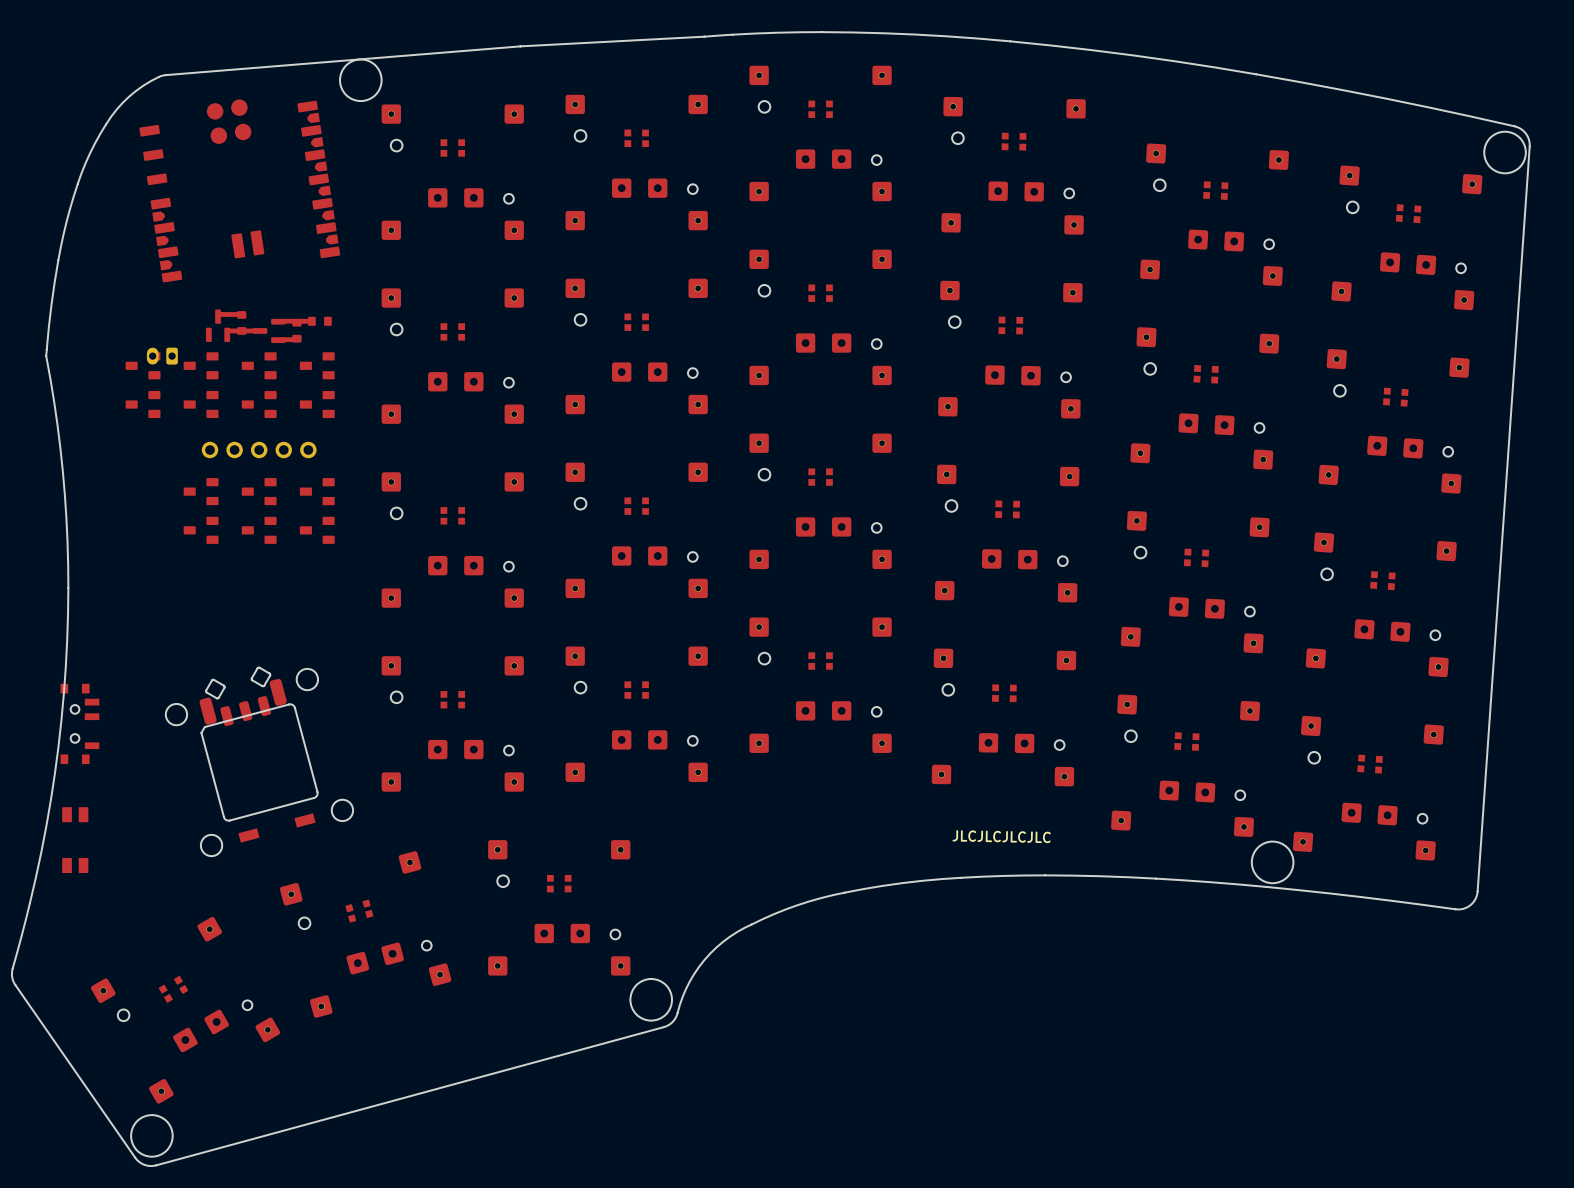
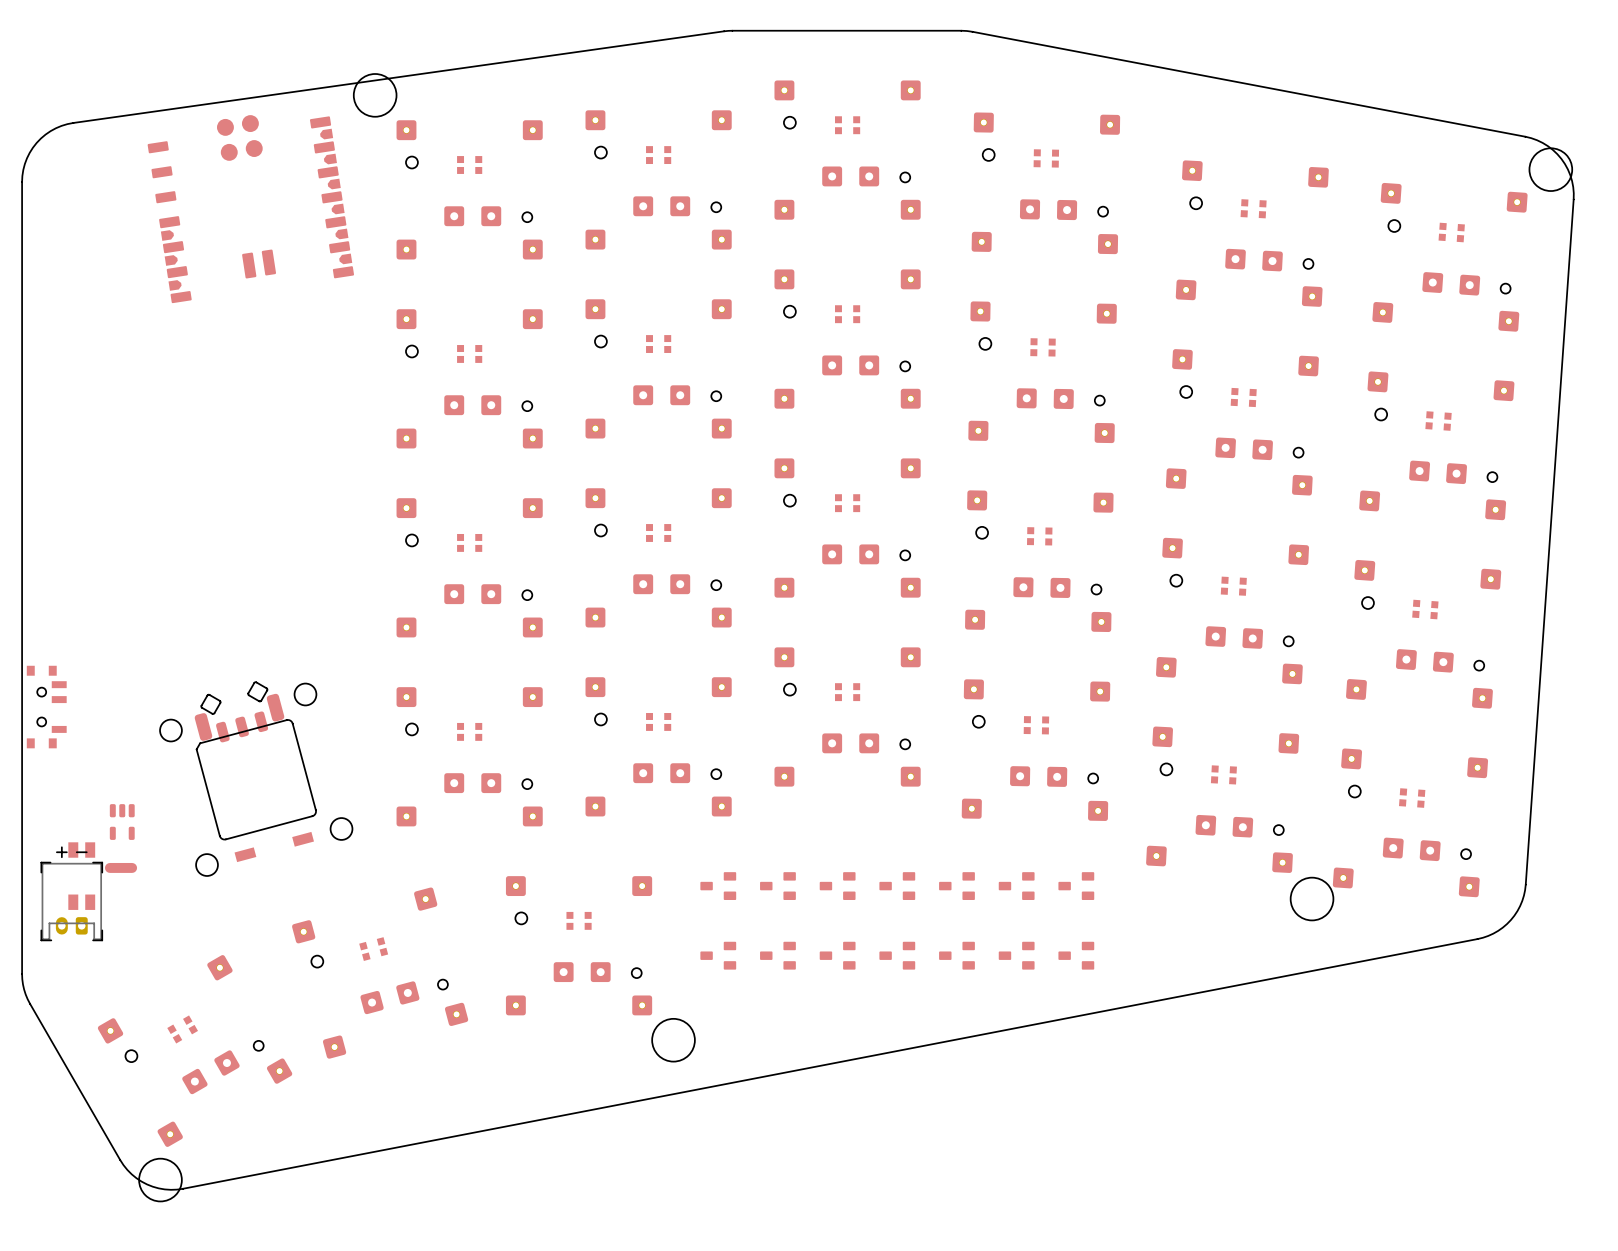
board edge: (1527, 181) (1529, 142) (1524, 131) (1514, 126) (1385, 98) (1215, 67) (1092, 50) (979, 38) (853, 32) (754, 33) (520, 46) (165, 75) (151, 81) (129, 96) (116, 109) (90, 153) (70, 208) (54, 282) (46, 356) (57, 425) (66, 518) (68, 588) (65, 667) (58, 746) (46, 825) (11, 975) (15, 985) (135, 1157) (144, 1164) (153, 1165) (665, 1026) (676, 1016) (682, 996) (694, 973) (710, 953) (722, 942) (744, 928) (774, 914) (832, 895) (883, 885) (941, 879) (1024, 875) (1100, 876) (1266, 886) (1460, 909) (1470, 905) (1476, 895) (1480, 848) -> (1573, 199) (1572, 181) (1561, 158) (1547, 146) (1531, 138) (961, 30) (728, 30) (73, 122) (55, 128) (36, 142) (26, 158) (22, 175) (22, 979) (30, 1003) (120, 1159) (131, 1174) (147, 1184) (164, 1189) (183, 1188) (1477, 939) (1493, 933) (1510, 920) (1522, 900) (1525, 884)
part: (268, 326) -> none
part: (162, 356) -> none
part: (143, 365) -> none
part: (201, 365) -> none
part: (259, 365) -> none
part: (317, 365) -> none
part: (143, 404) -> none
part: (201, 404) -> none
part: (259, 404) -> none
part: (317, 404) -> none
part: (259, 450) -> none
part: (201, 491) -> none
part: (259, 491) -> none
part: (317, 491) -> none
part: (201, 530) -> none
part: (259, 530) -> none
part: (317, 530) -> none
part position: (79, 723) -> (46, 707)
part position: (259, 761) -> (256, 778)
part: none -> (122, 822)
top track: none -> (132, 867) (109, 867)
text: JLCJLCJLCJLC (1001, 836) -> none
part: none -> (718, 886)
part: none -> (777, 886)
part: none -> (837, 886)
part: none -> (897, 886)
part: none -> (956, 886)
part: none -> (1016, 886)
part: none -> (1076, 886)
part: none -> (71, 893)
part: none -> (718, 955)
part: none -> (777, 955)
part: none -> (837, 955)
part: none -> (897, 955)
part: none -> (956, 955)
part: none -> (1016, 955)
part: none -> (1076, 955)

